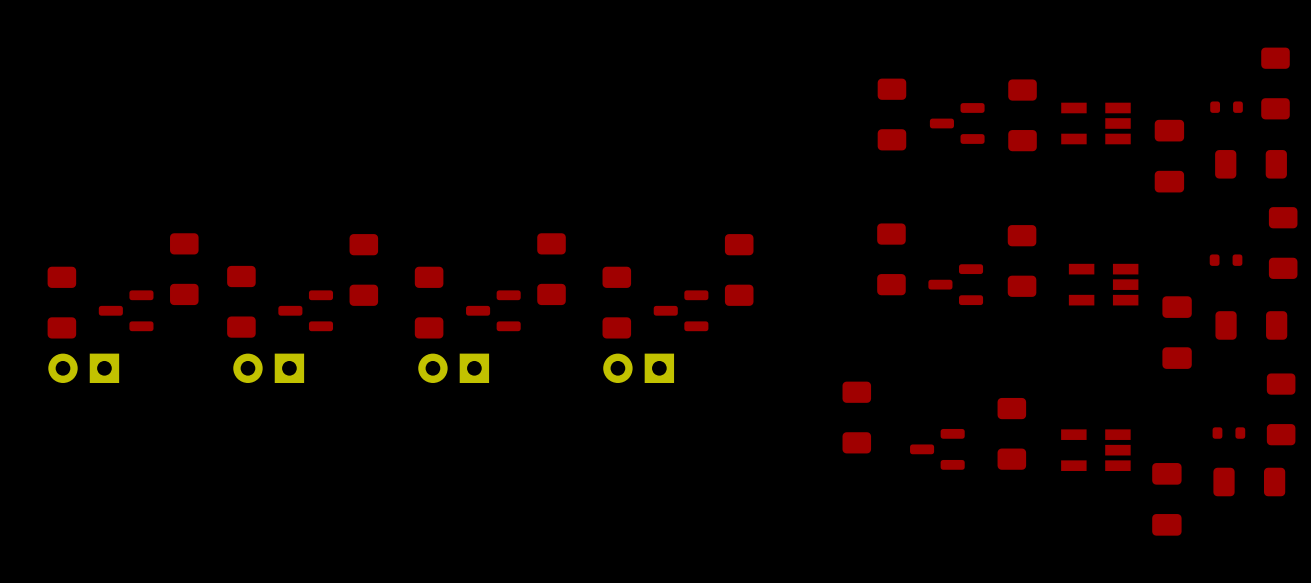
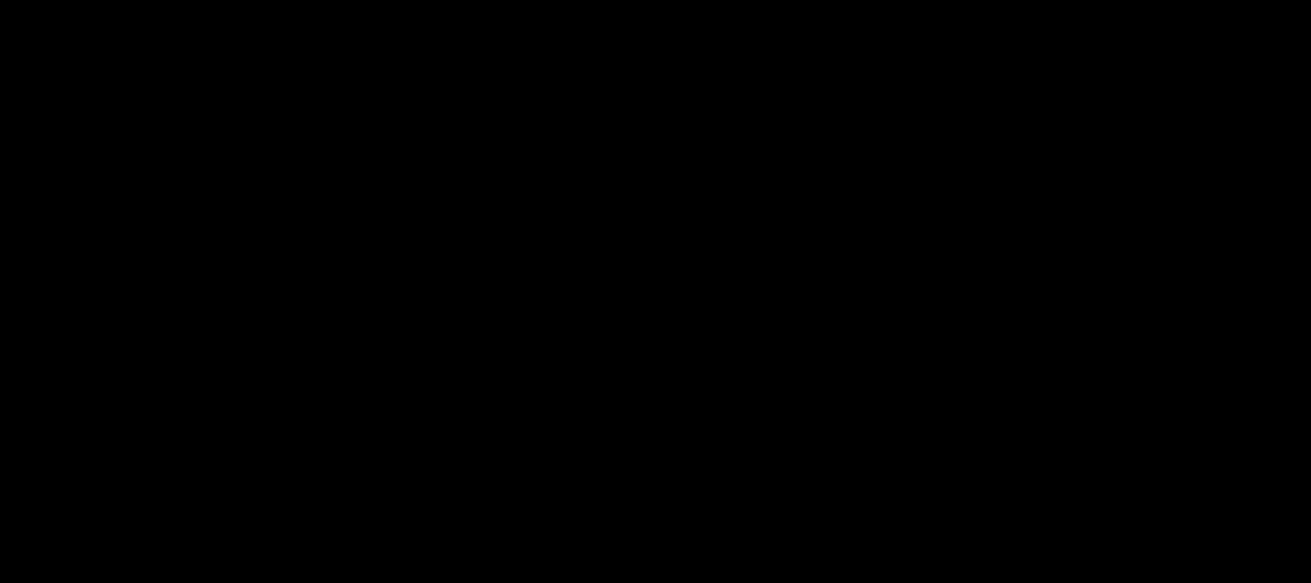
part: (1275, 83) -> none
part: (1226, 107) -> none
part: (891, 114) -> none
part: (1022, 115) -> none
part: (957, 123) -> none
part: (1095, 123) -> none
part: (1169, 156) -> none
part: (1251, 164) -> none
part: (1283, 243) -> none
part: (891, 259) -> none
part: (1022, 260) -> none
part: (1226, 260) -> none
part: (184, 269) -> none
part: (363, 269) -> none
part: (551, 269) -> none
part: (739, 269) -> none
part: (955, 284) -> none
part: (1103, 284) -> none
part: (241, 301) -> none
part: (61, 302) -> none
part: (429, 302) -> none
part: (616, 302) -> none
part: (126, 310) -> none
part: (305, 310) -> none
part: (493, 310) -> none
part: (681, 310) -> none
part: (1251, 325) -> none
part: (1177, 332) -> none
part: (83, 368) -> none
part: (268, 368) -> none
part: (453, 368) -> none
part: (638, 368) -> none
part: (1281, 409) -> none
part: (856, 417) -> none
part: (1011, 433) -> none
part: (1228, 433) -> none
part: (937, 449) -> none
part: (1095, 450) -> none
part: (1249, 482) -> none
part: (1166, 499) -> none

